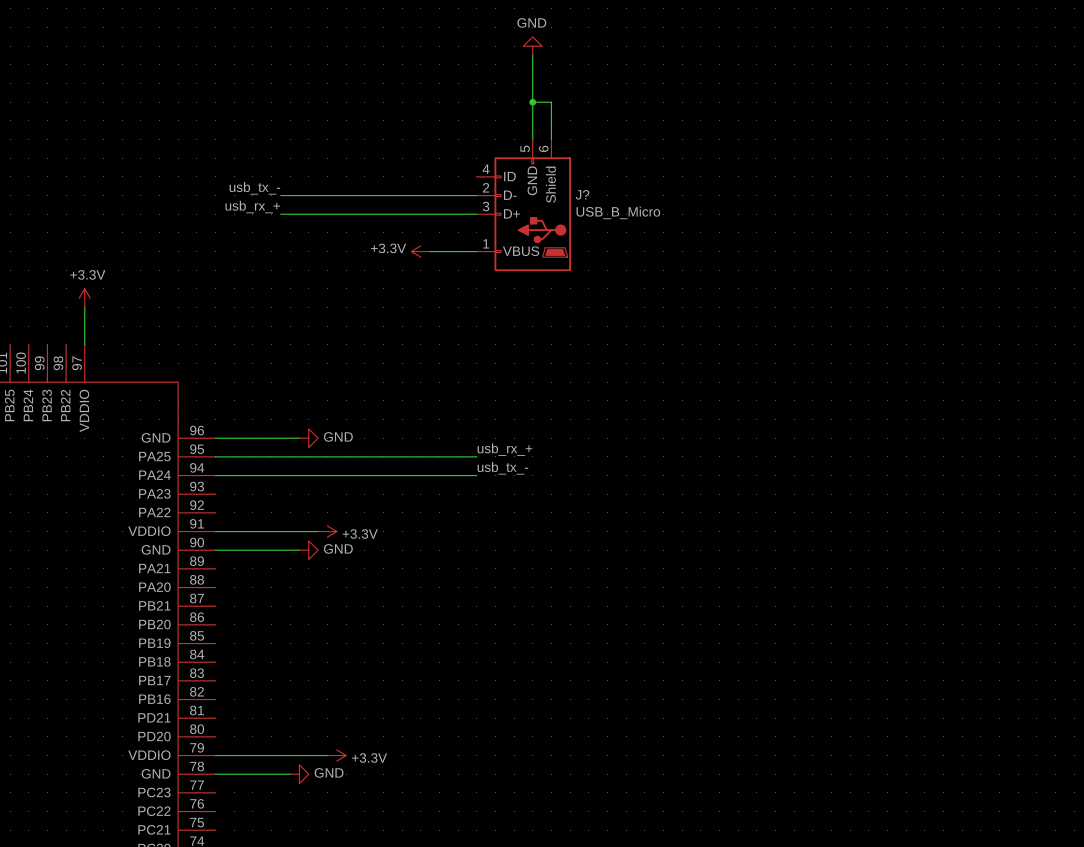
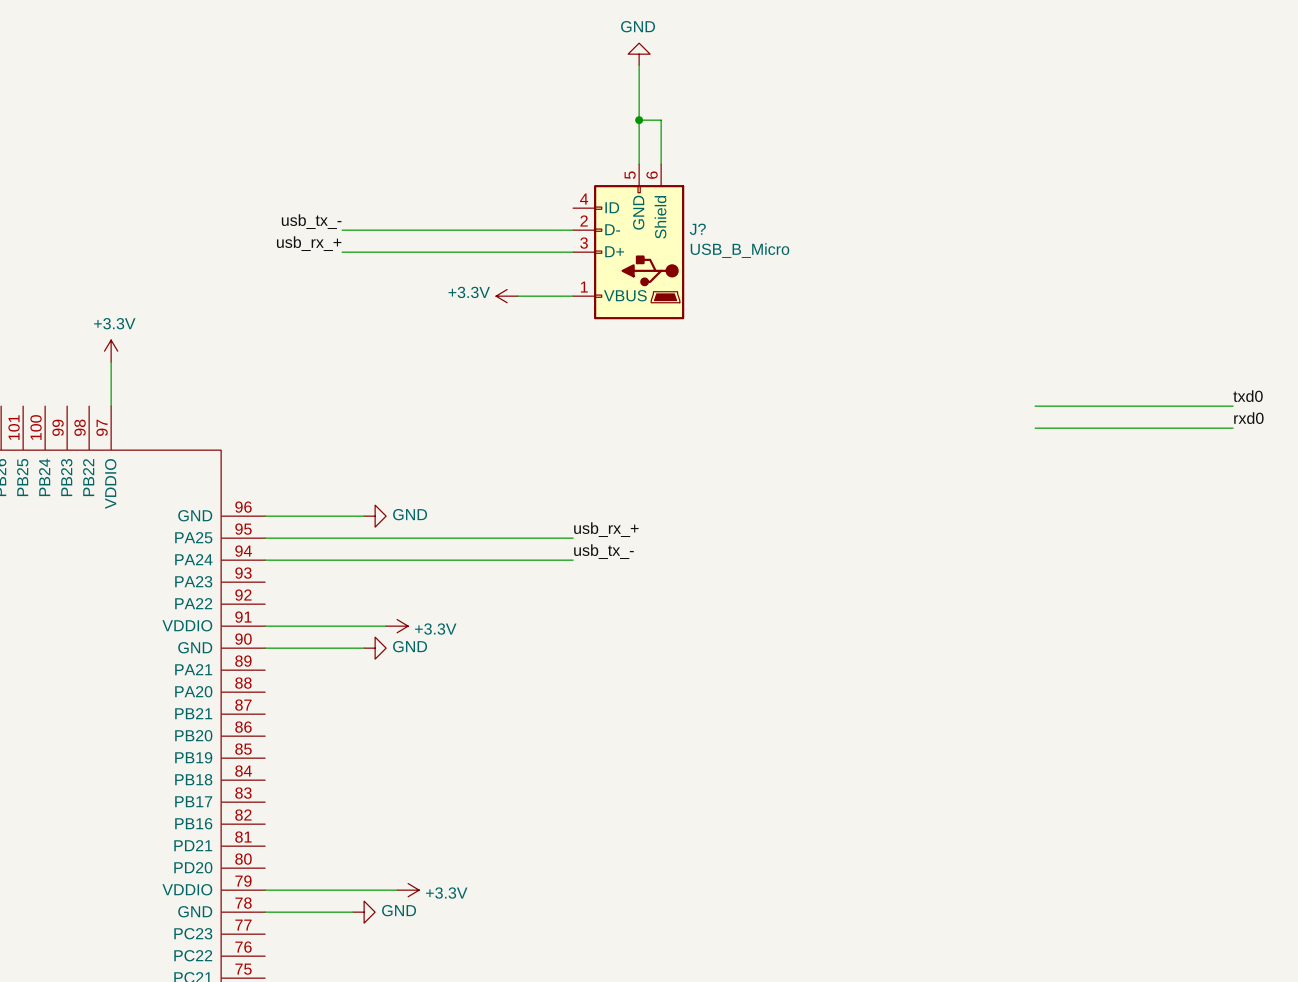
label: none -> txd0 (1248, 396)
wire: none -> (1035, 406) (1233, 406)
label: none -> rxd0 (1248, 418)
wire: none -> (1035, 428) (1233, 428)

